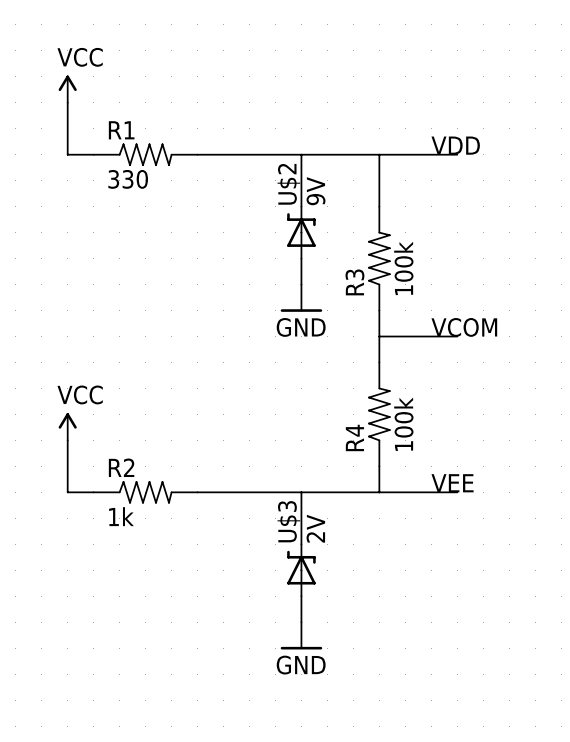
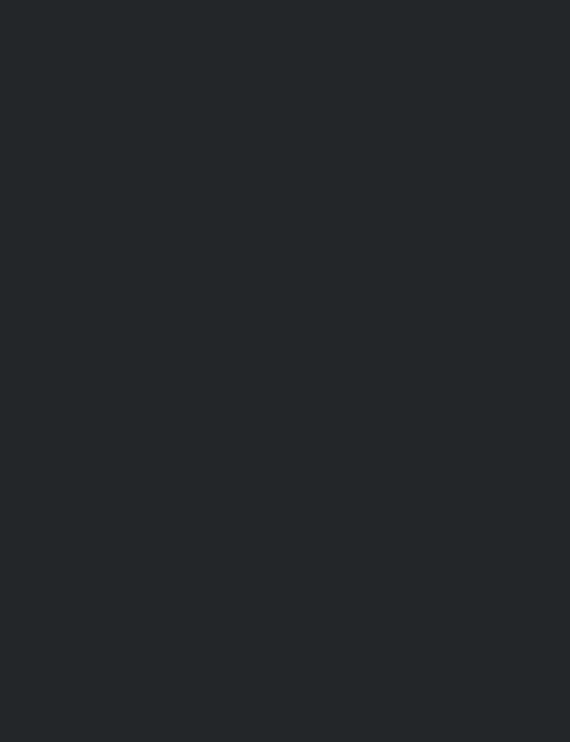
power symbol: VCC (67, 89) -> none
wire: (67, 102) (67, 154) (93, 154) -> none
label: VDD (455, 145) -> none
R1: 330 (145, 154) -> none
wire: (197, 154) (457, 154) -> none
wire: (301, 154) (301, 206) -> none
wire: (379, 154) (379, 206) -> none
U$2: 9V (301, 232) -> none
wire: (301, 258) (301, 284) -> none
R3: 100k (379, 258) -> none
power symbol: GND (301, 298) -> none
wire: (379, 310) (379, 362) -> none
label: VCOM (464, 327) -> none
wire: (379, 336) (457, 336) -> none
R4: 100k (379, 414) -> none
power symbol: VCC (67, 426) -> none
wire: (67, 440) (67, 492) (93, 492) -> none
wire: (379, 466) (379, 492) -> none
label: VEE (452, 483) -> none
R2: 1k (145, 492) -> none
wire: (197, 492) (457, 492) -> none
wire: (301, 492) (301, 544) -> none
U$3: 2V (301, 570) -> none
wire: (301, 596) (301, 622) -> none
power symbol: GND (301, 635) -> none

